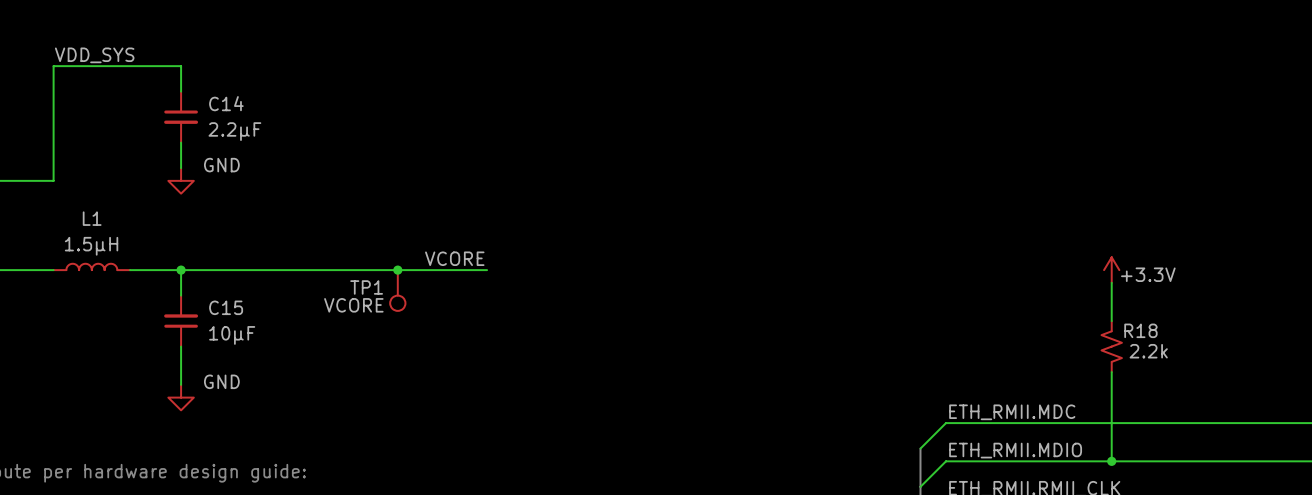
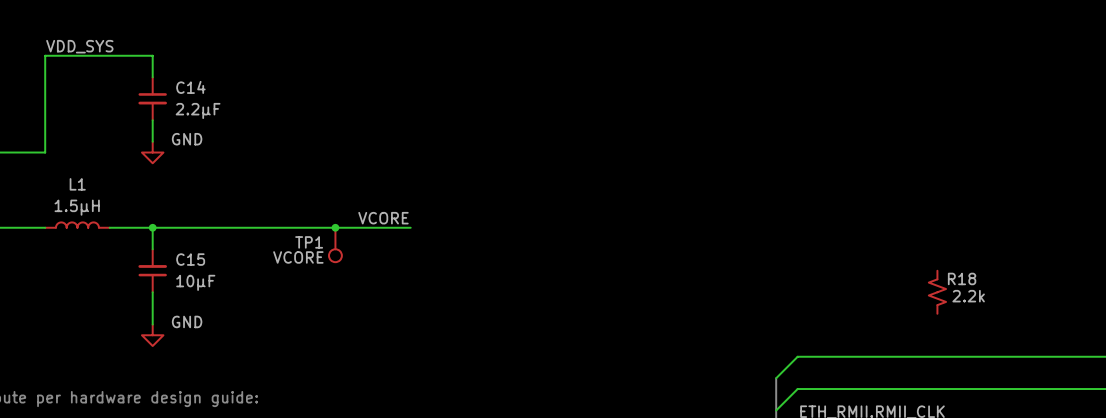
power symbol: +3.3V (1111, 270) -> none
wire: (1111, 282) (1111, 321) -> none
wire: (1111, 372) (1111, 461) -> none
label: ETH_RMII.MDC (1012, 412) -> none
label: ETH_RMII.MDIO (1015, 450) -> none
junction: (1111, 461) -> none

